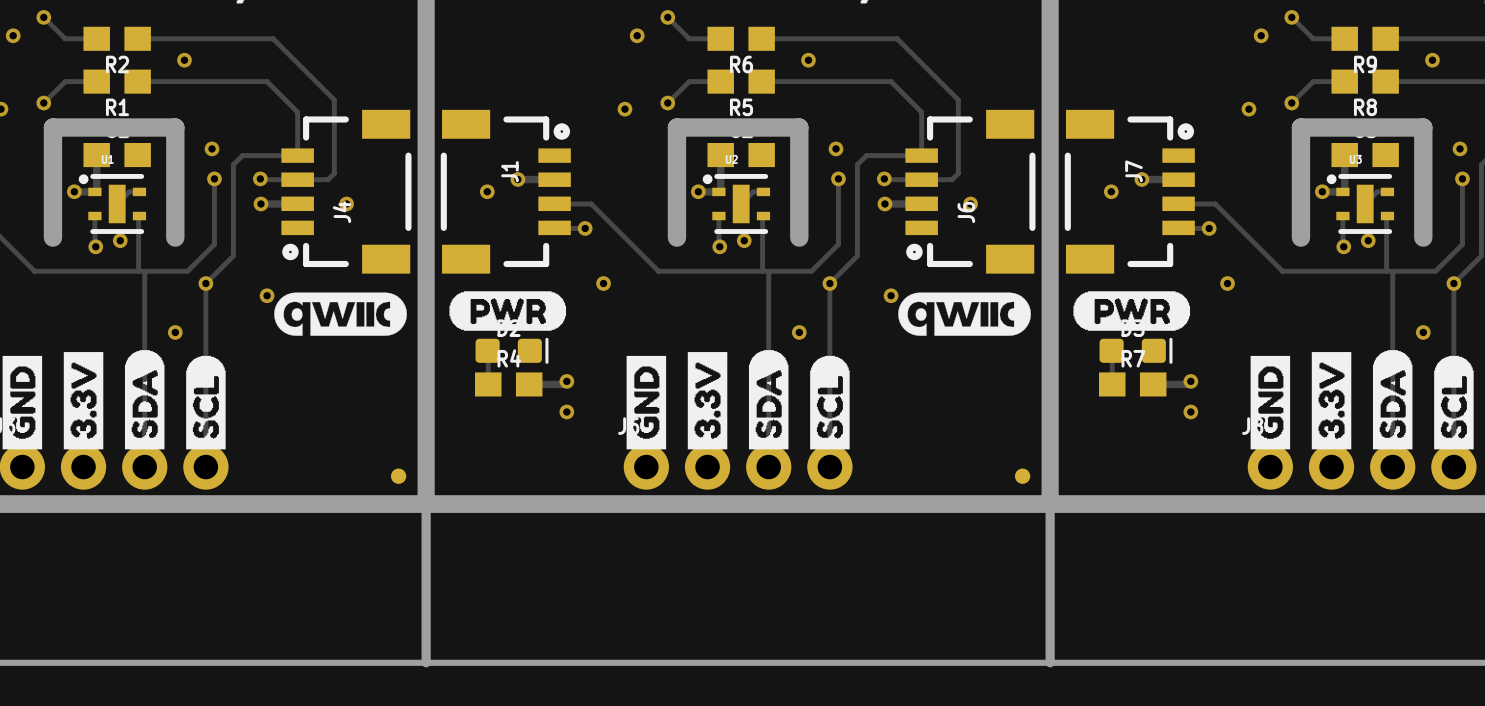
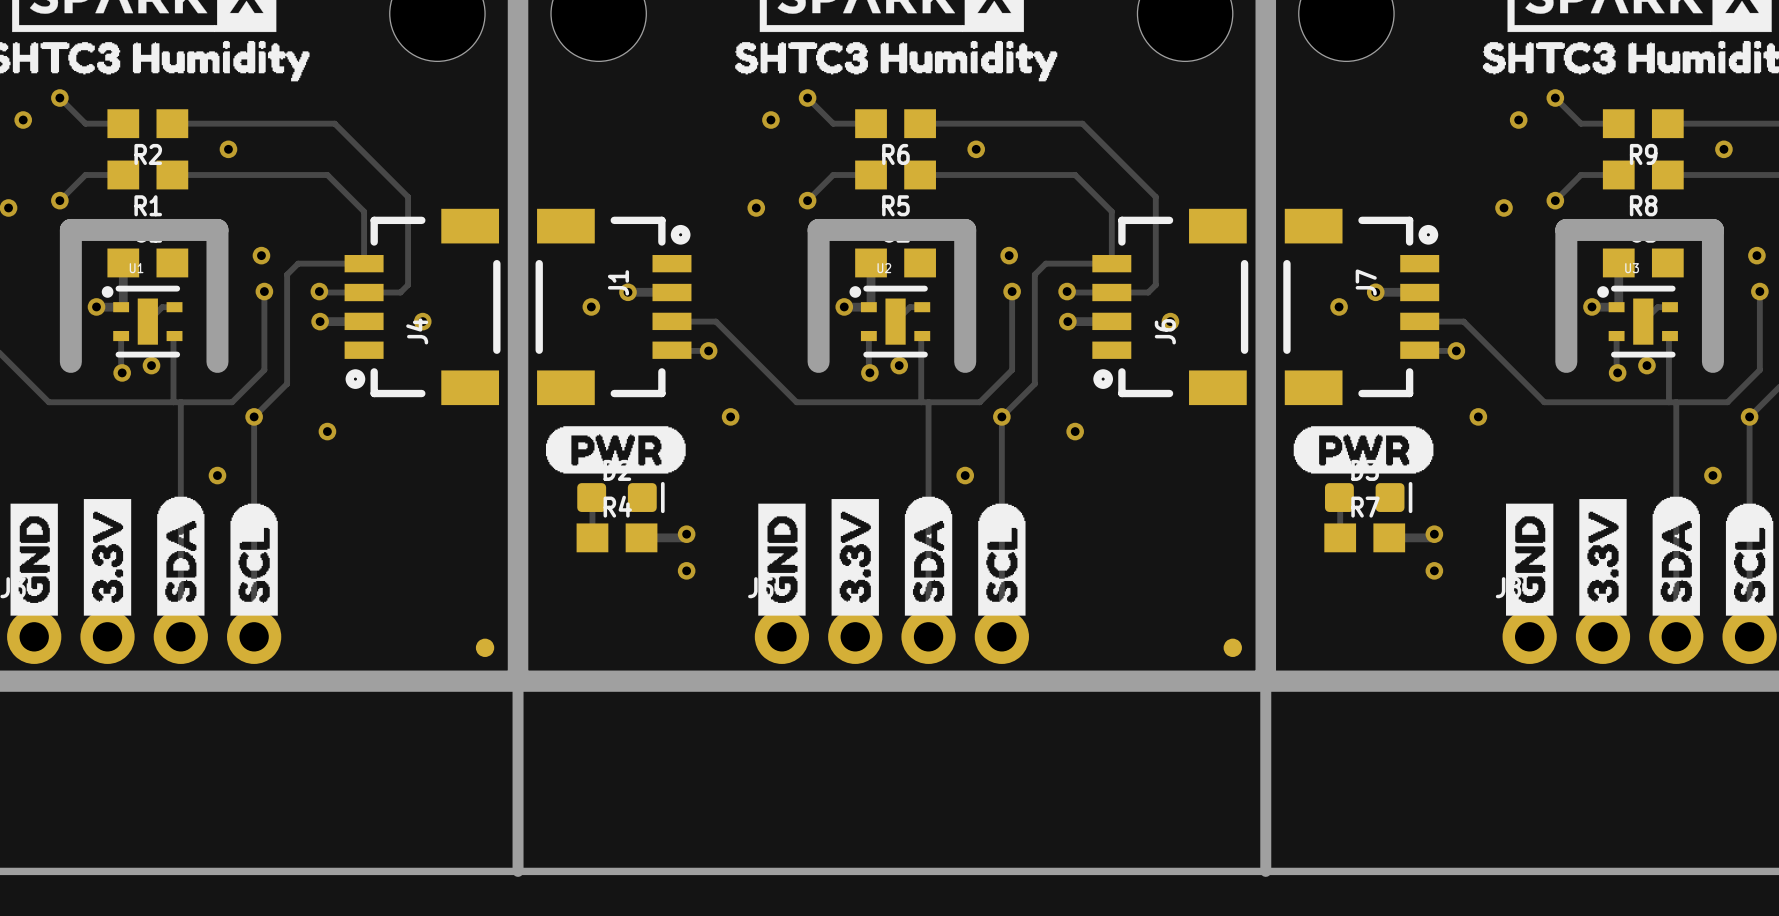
drawing: [274, 292, 407, 336] -> none
drawing: [898, 292, 1031, 336] -> none

